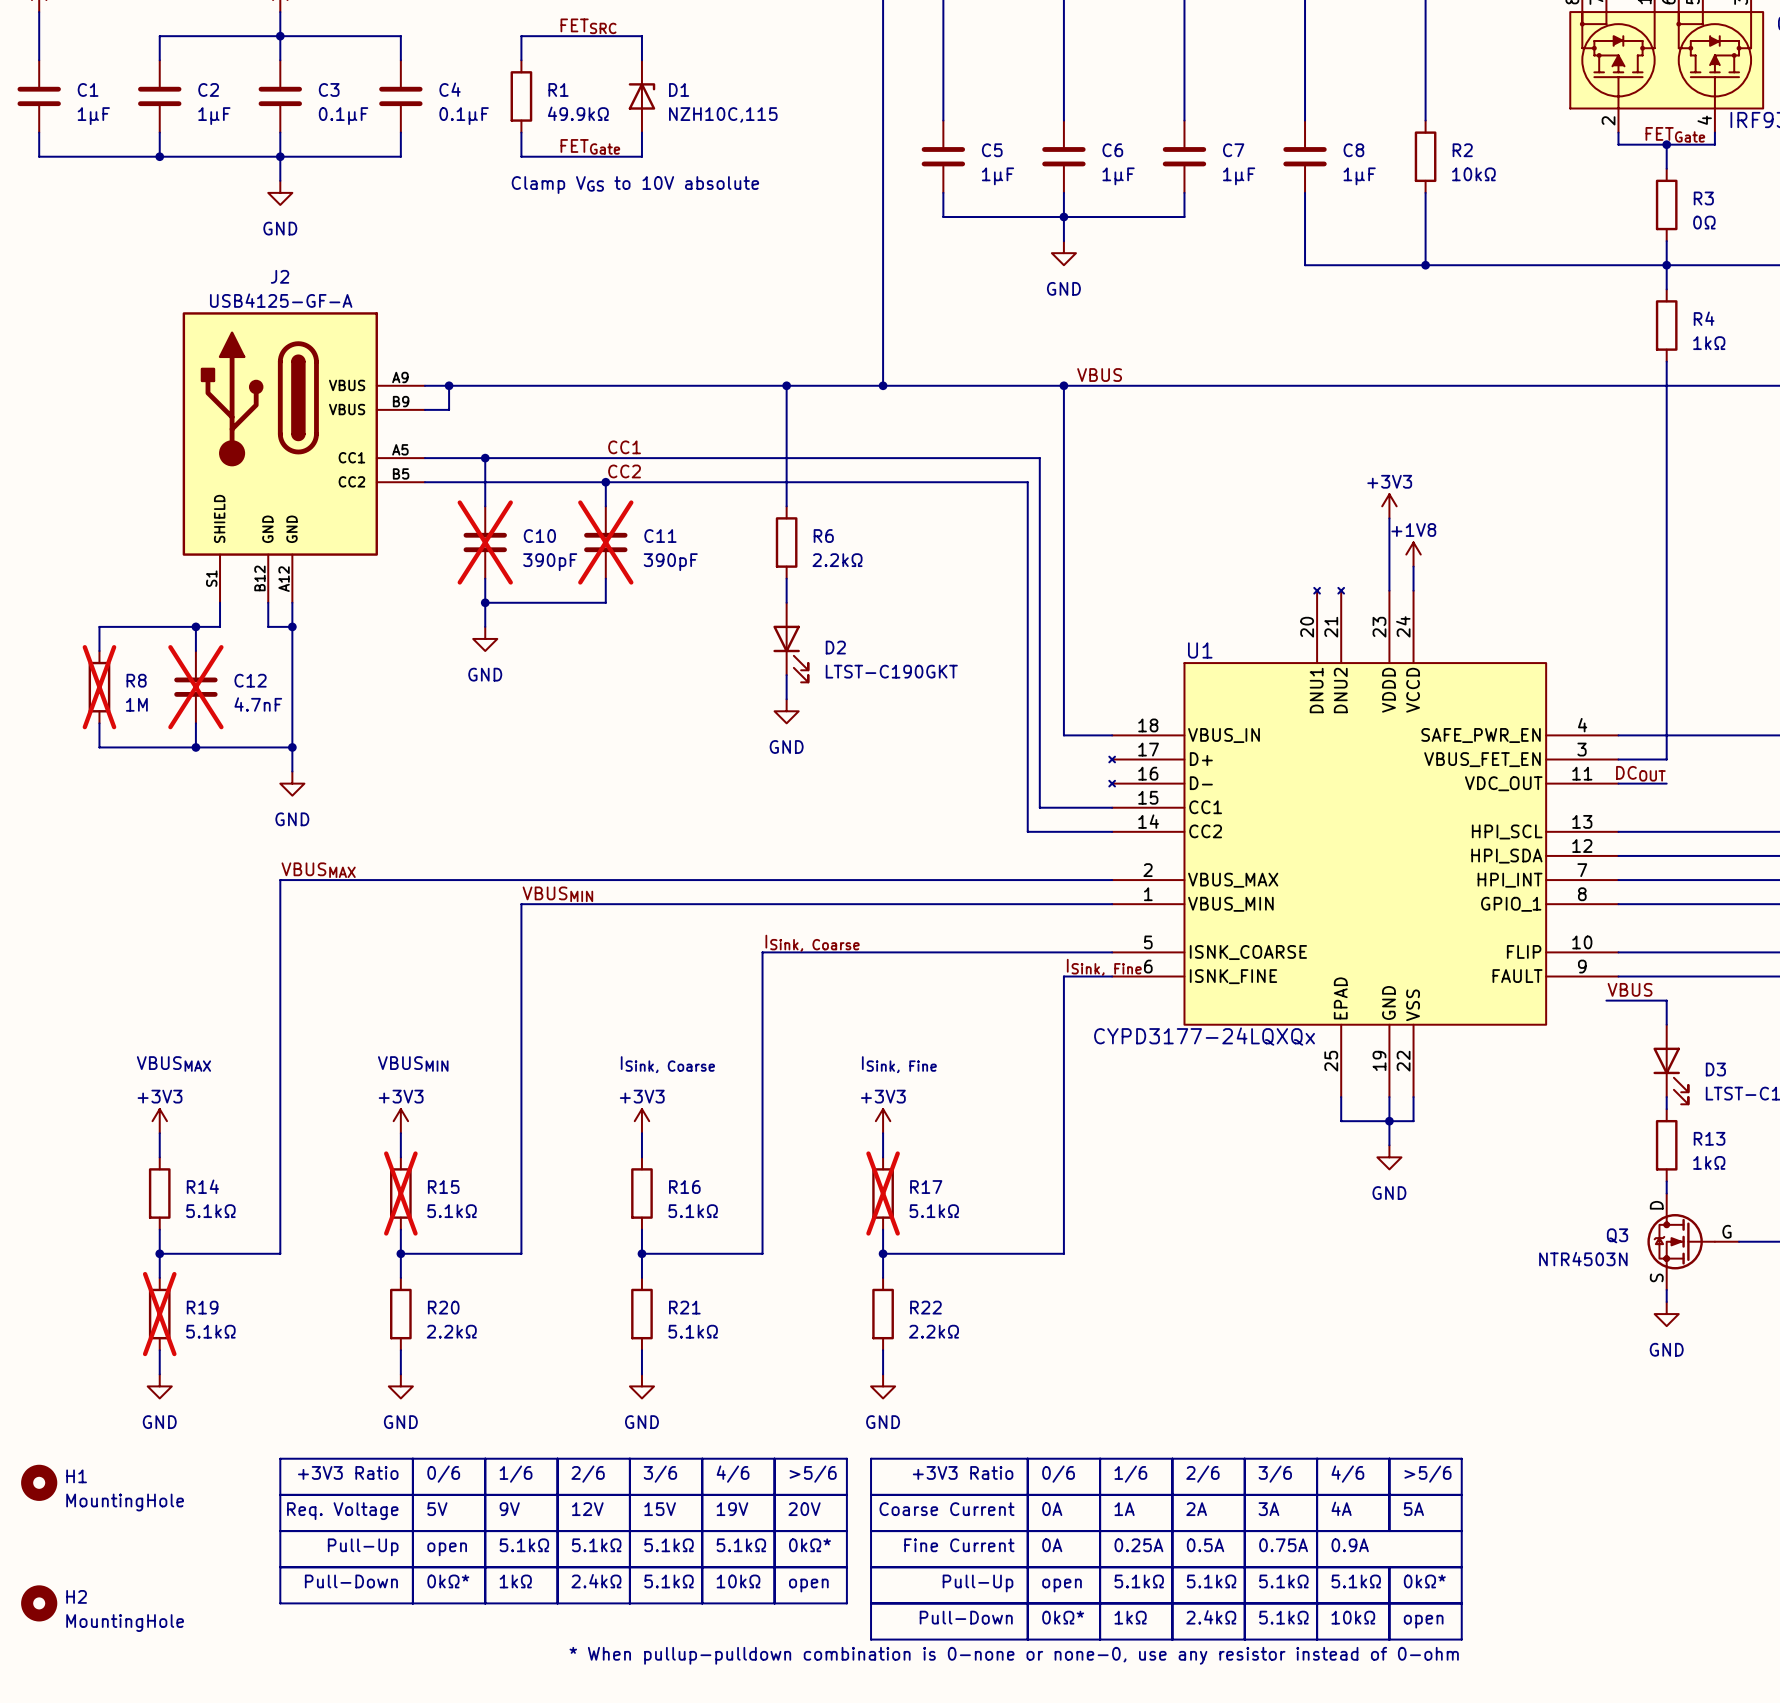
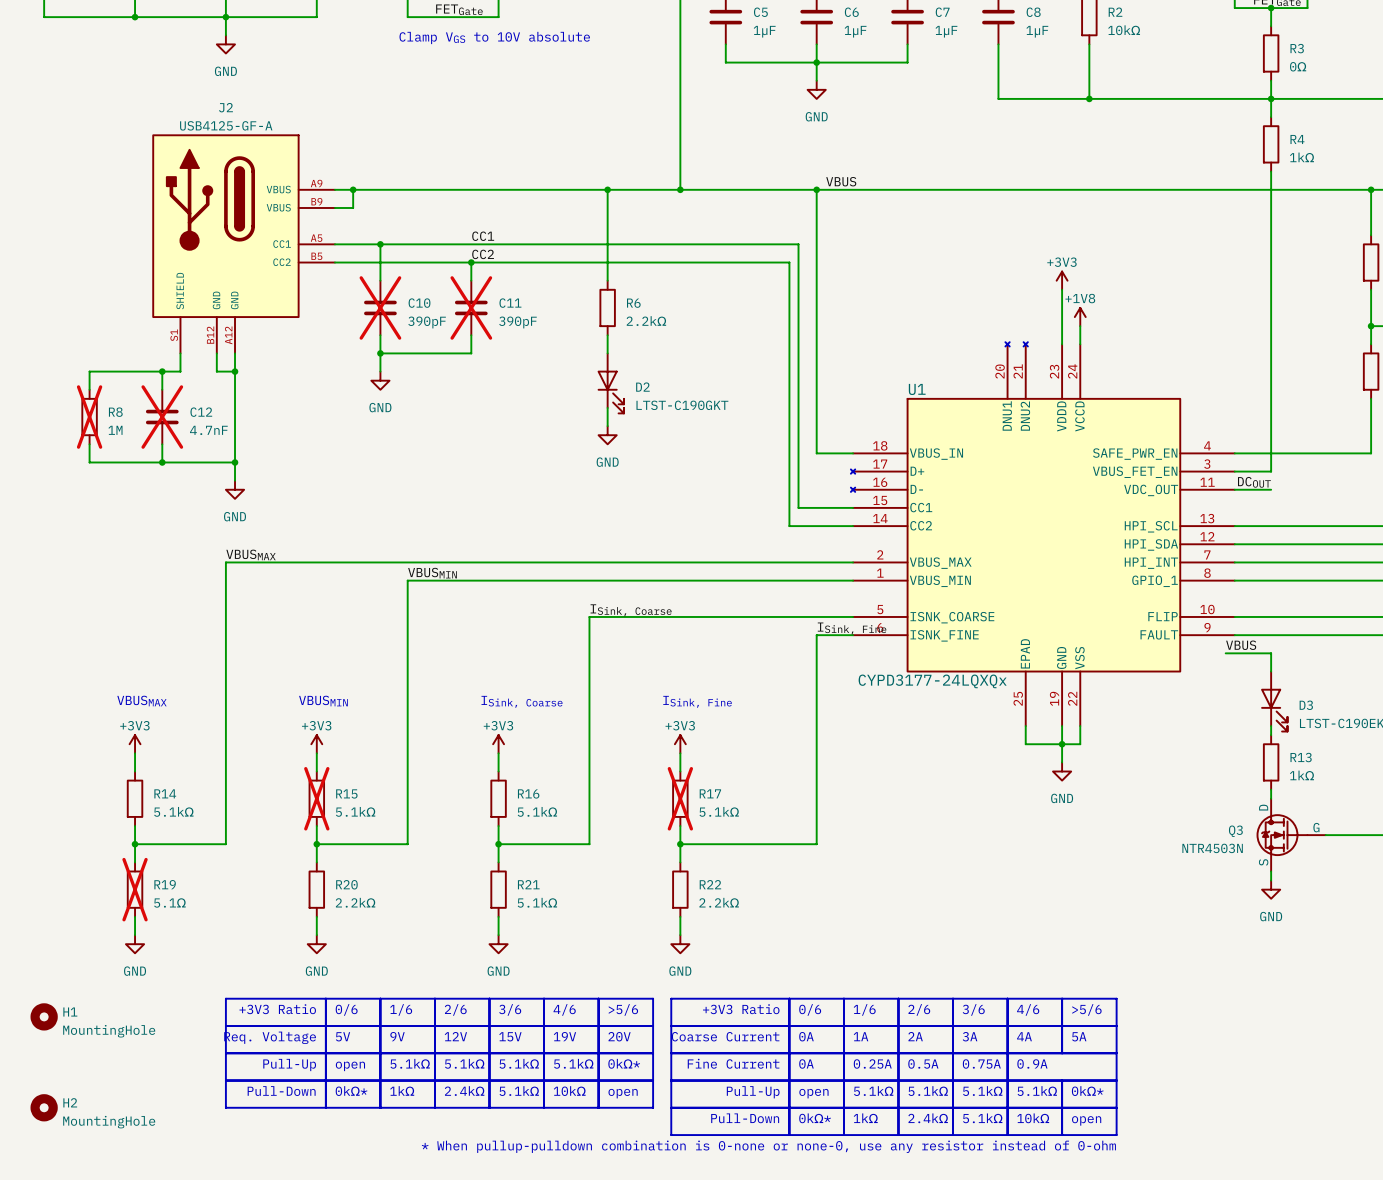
R19 value: 5.1kΩ (210, 1331) -> 5.1Ω (169, 902)

